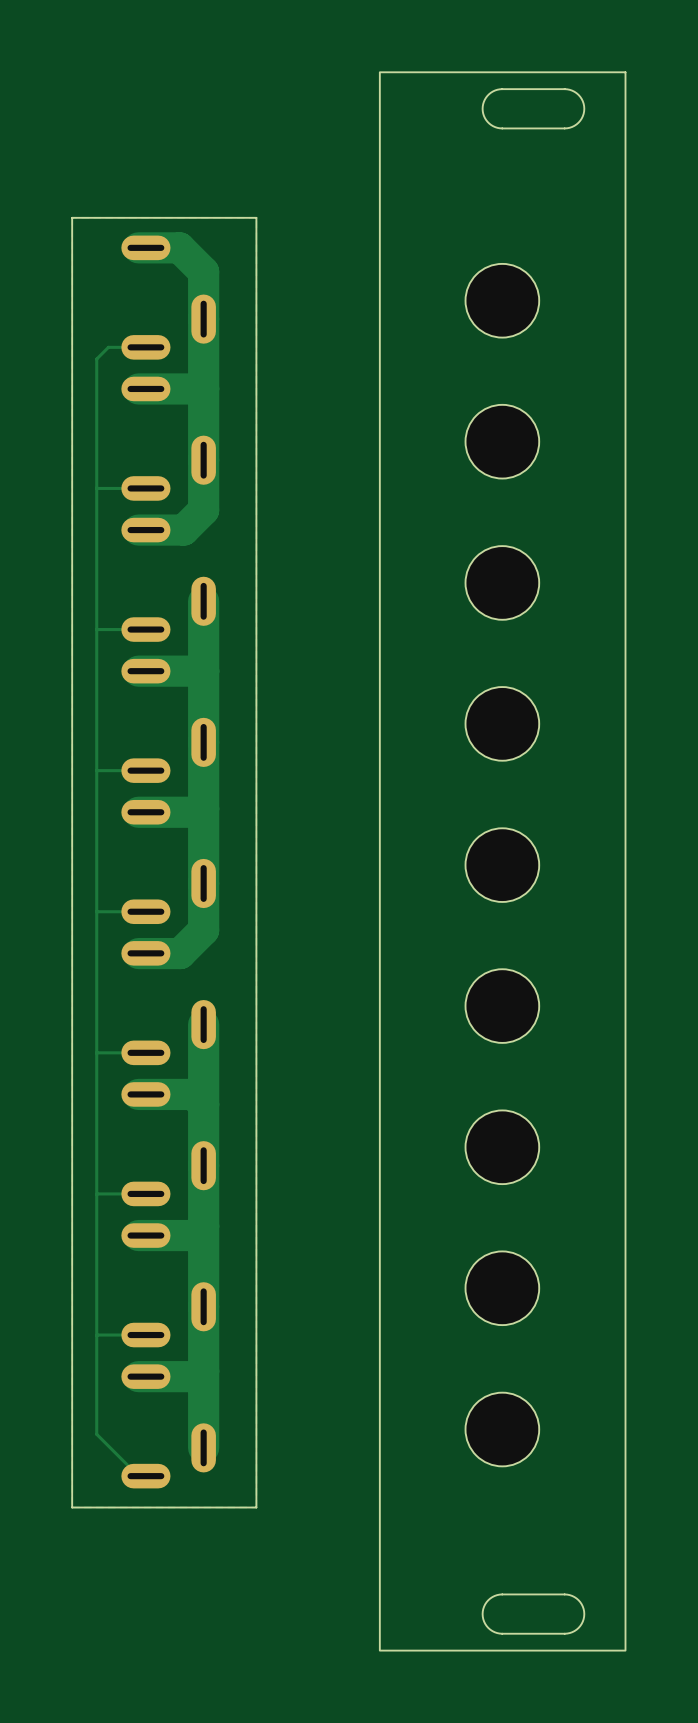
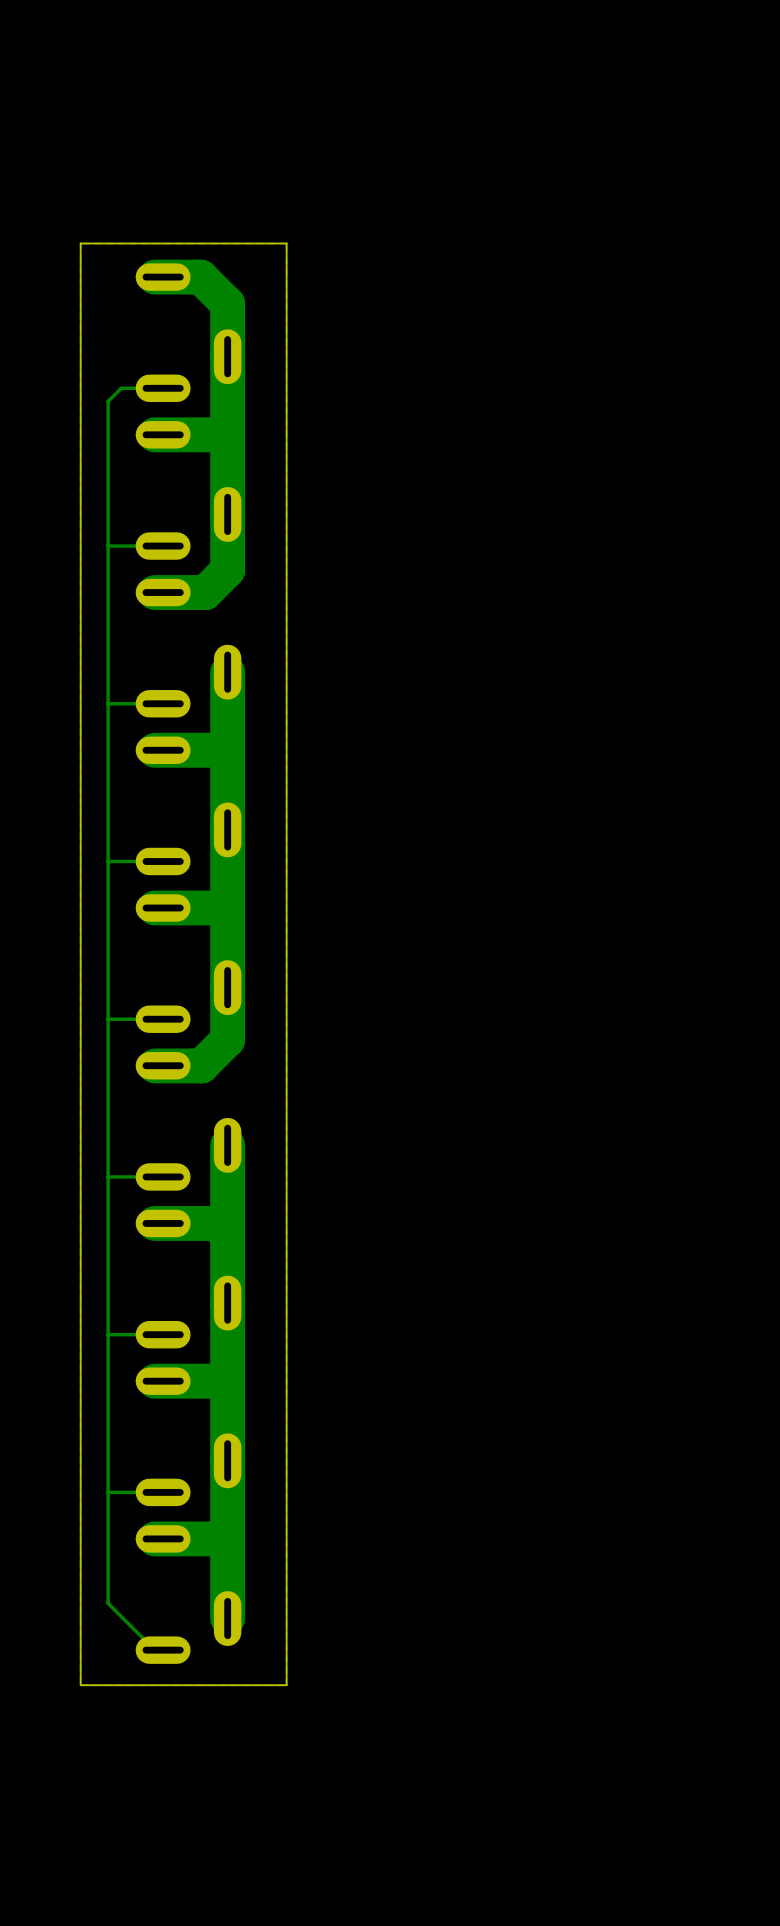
drawing: [379, 71, 627, 1652] -> none
part: (502, 300) -> none
part: (502, 441) -> none
part: (502, 582) -> none
part: (502, 723) -> none
part: (502, 865) -> none
part: (502, 1006) -> none
part: (502, 1147) -> none
part: (502, 1288) -> none
part: (502, 1429) -> none

